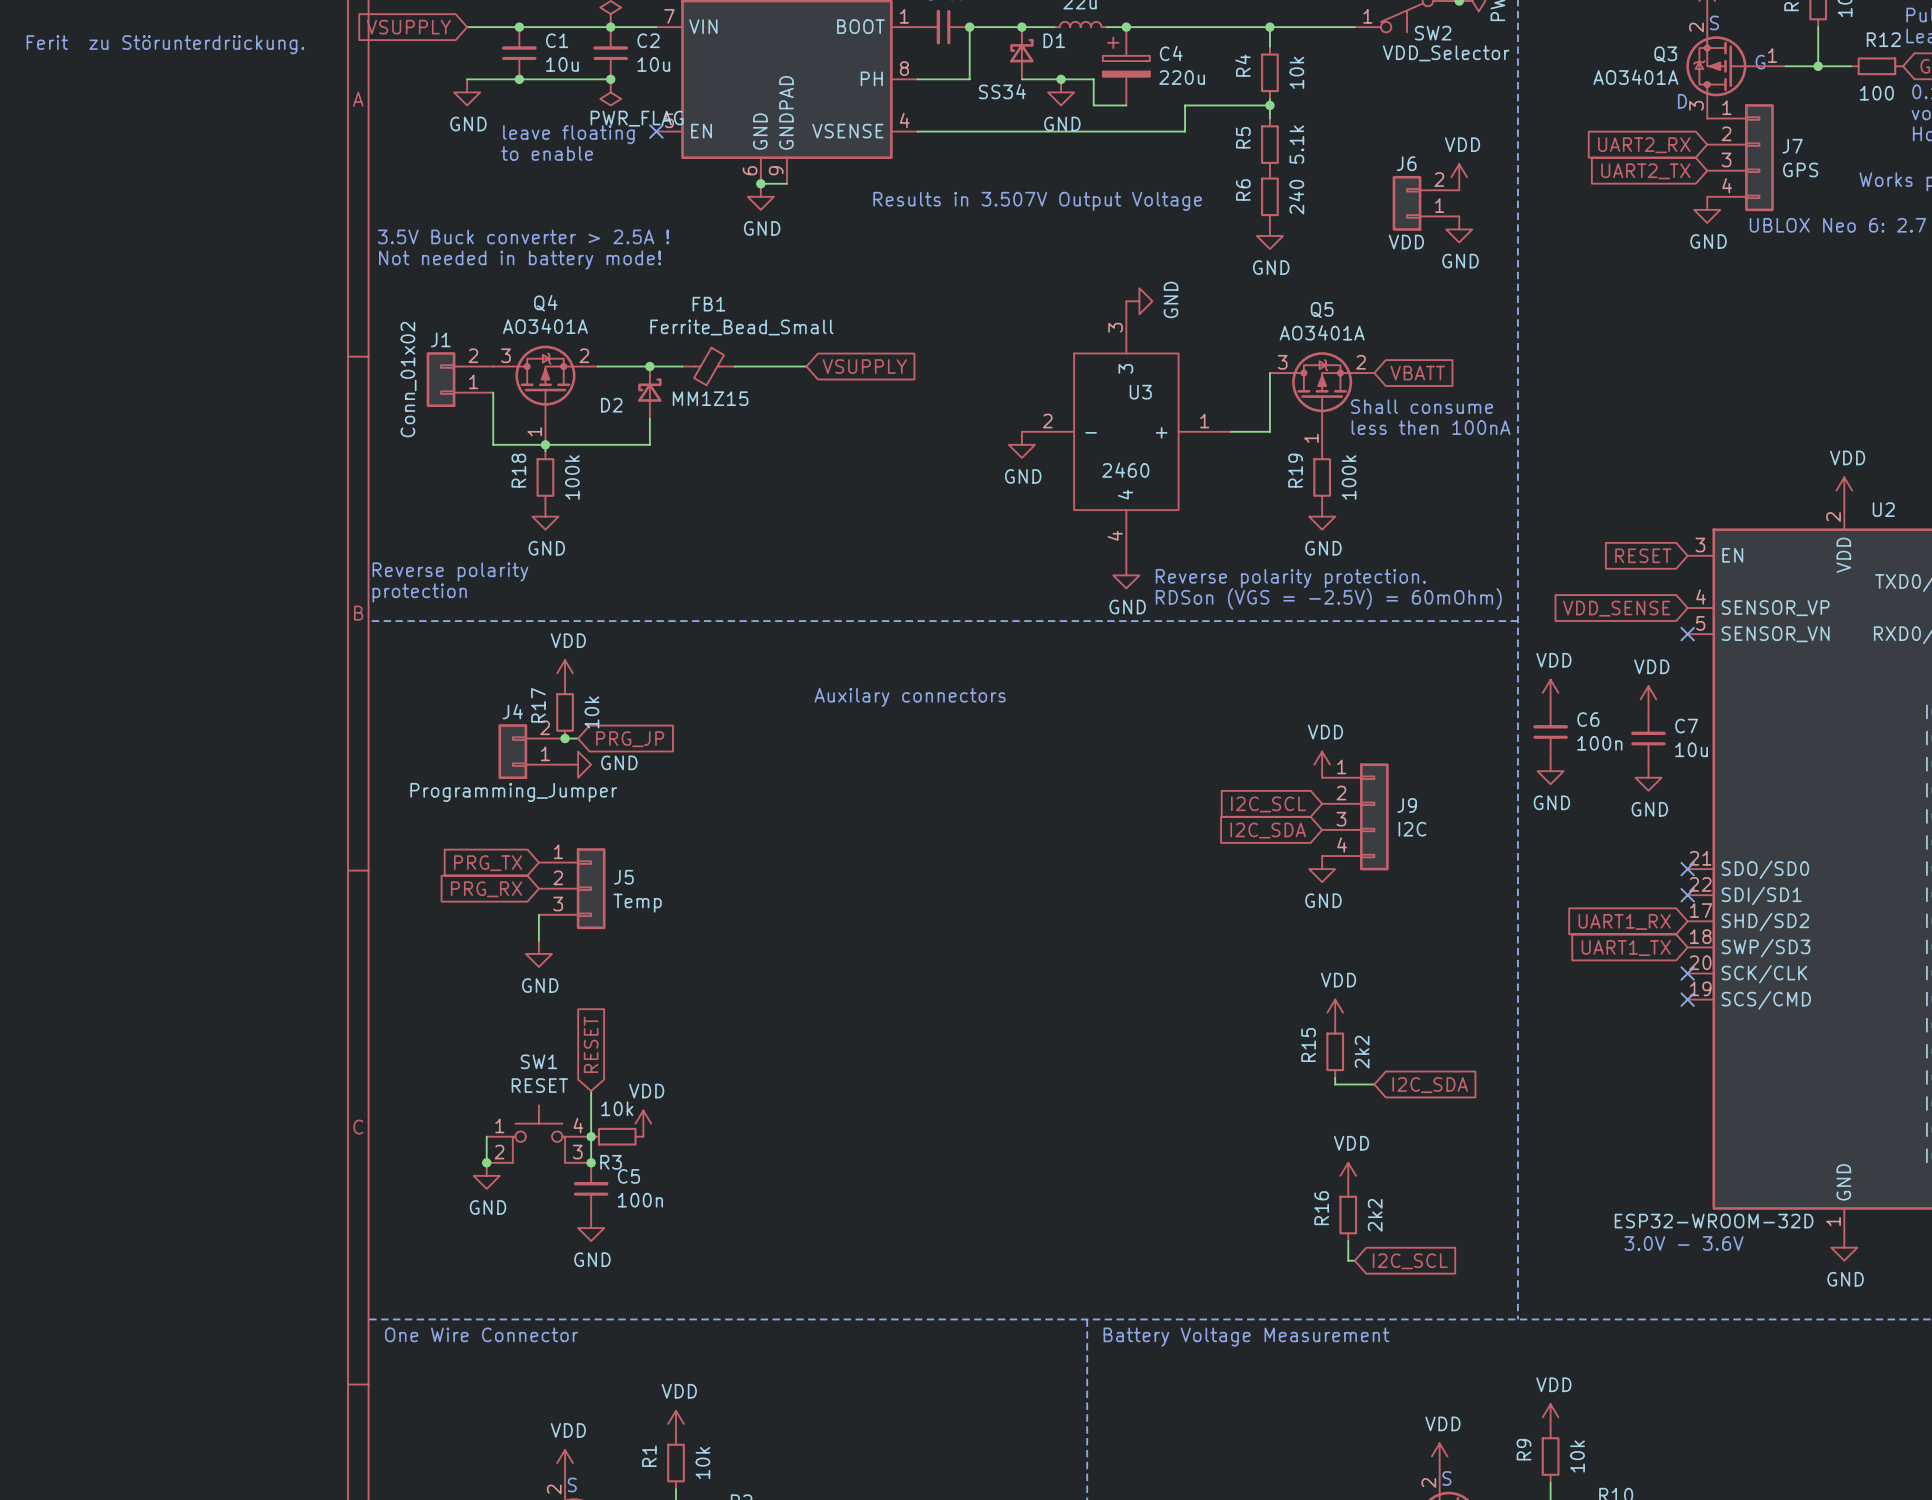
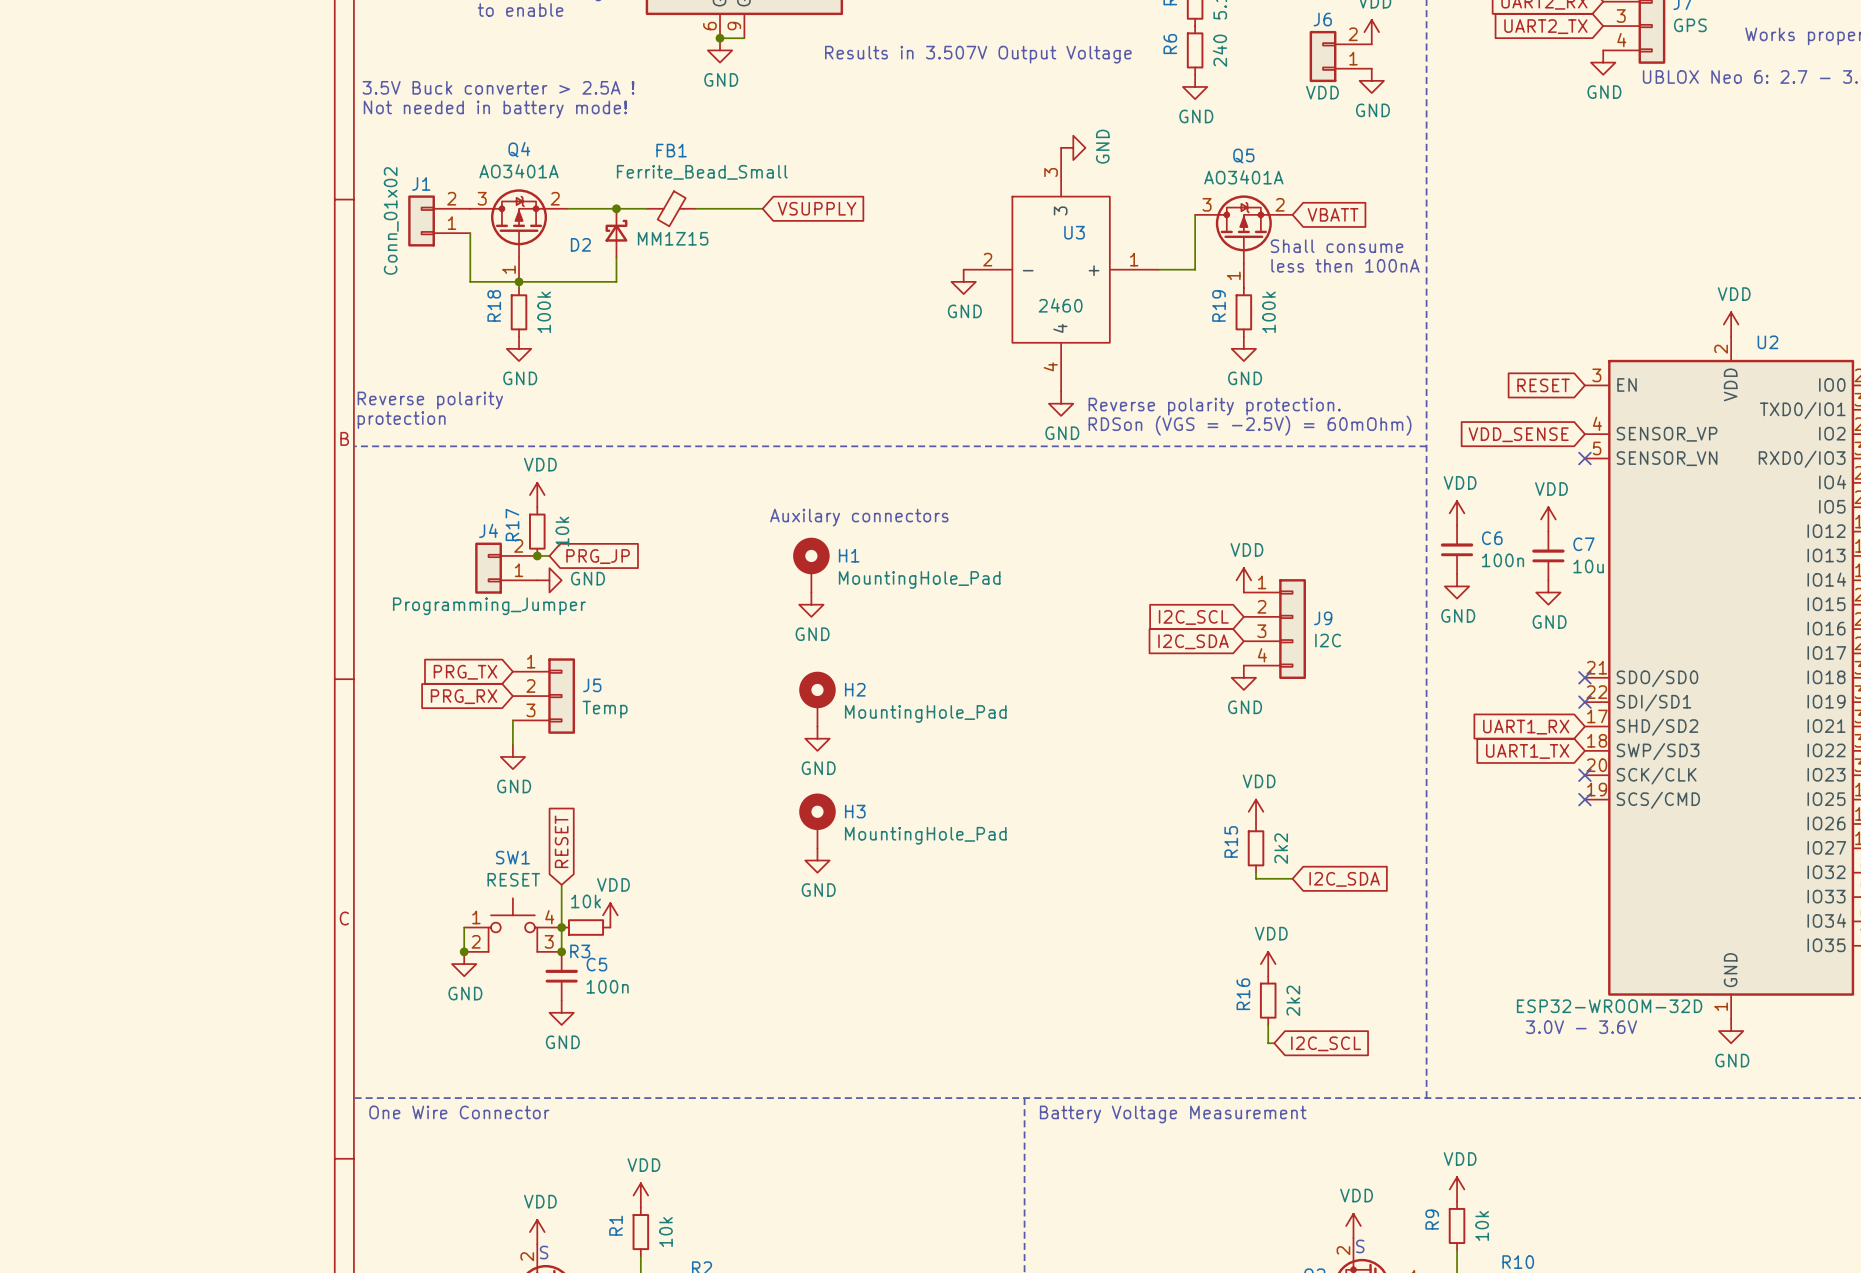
H1: none -> MountingHole_Pad (811, 565)
power symbol: none -> GND (811, 604)
H2: none -> MountingHole_Pad (817, 699)
power symbol: none -> GND (817, 738)
H3: none -> MountingHole_Pad (817, 820)
power symbol: none -> GND (817, 860)

